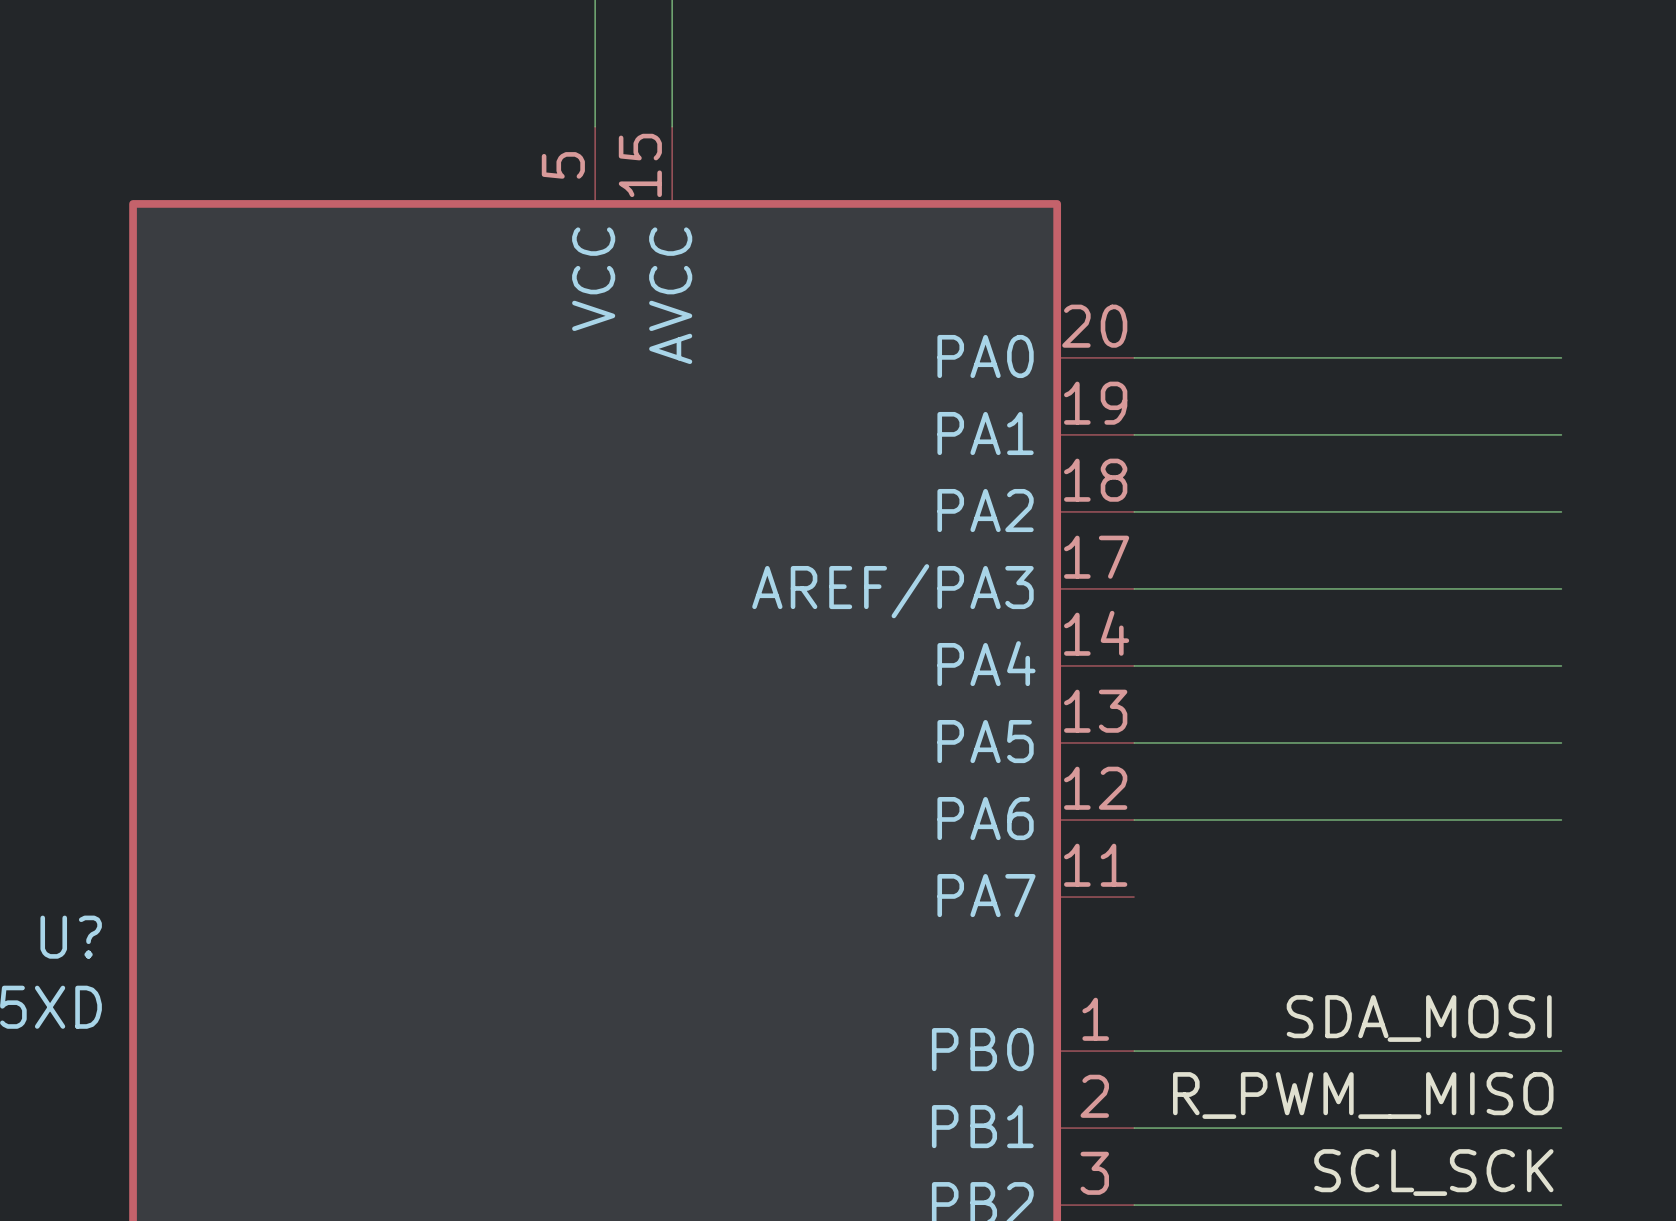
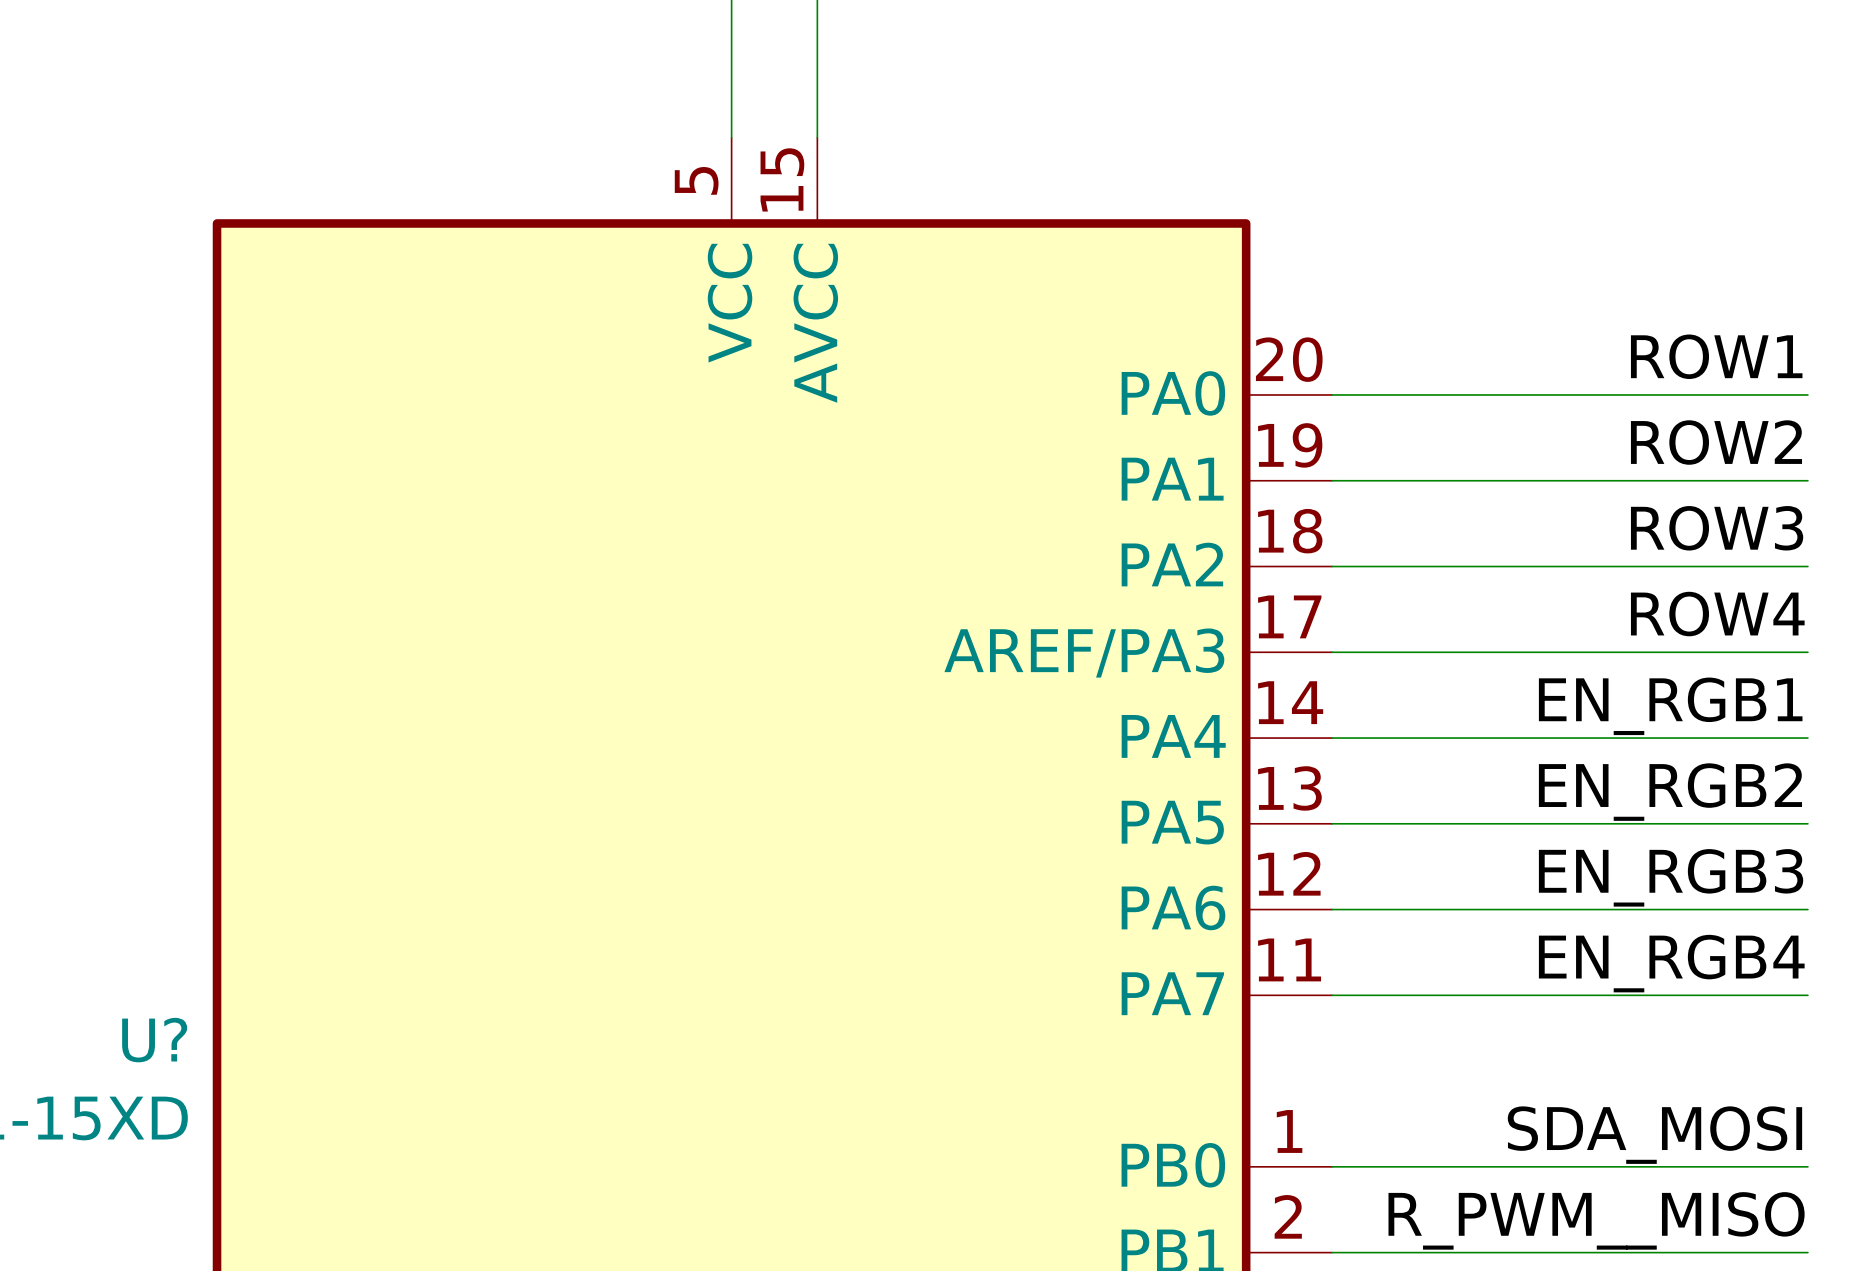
label: none -> ROW1 (1716, 356)
label: none -> ROW2 (1716, 442)
label: none -> ROW3 (1717, 528)
label: none -> ROW4 (1717, 614)
label: none -> EN_RGB1 (1670, 706)
label: none -> EN_RGB2 (1670, 792)
label: none -> EN_RGB3 (1671, 877)
label: none -> EN_RGB4 (1671, 963)
wire: none -> (1331, 995) (1807, 995)

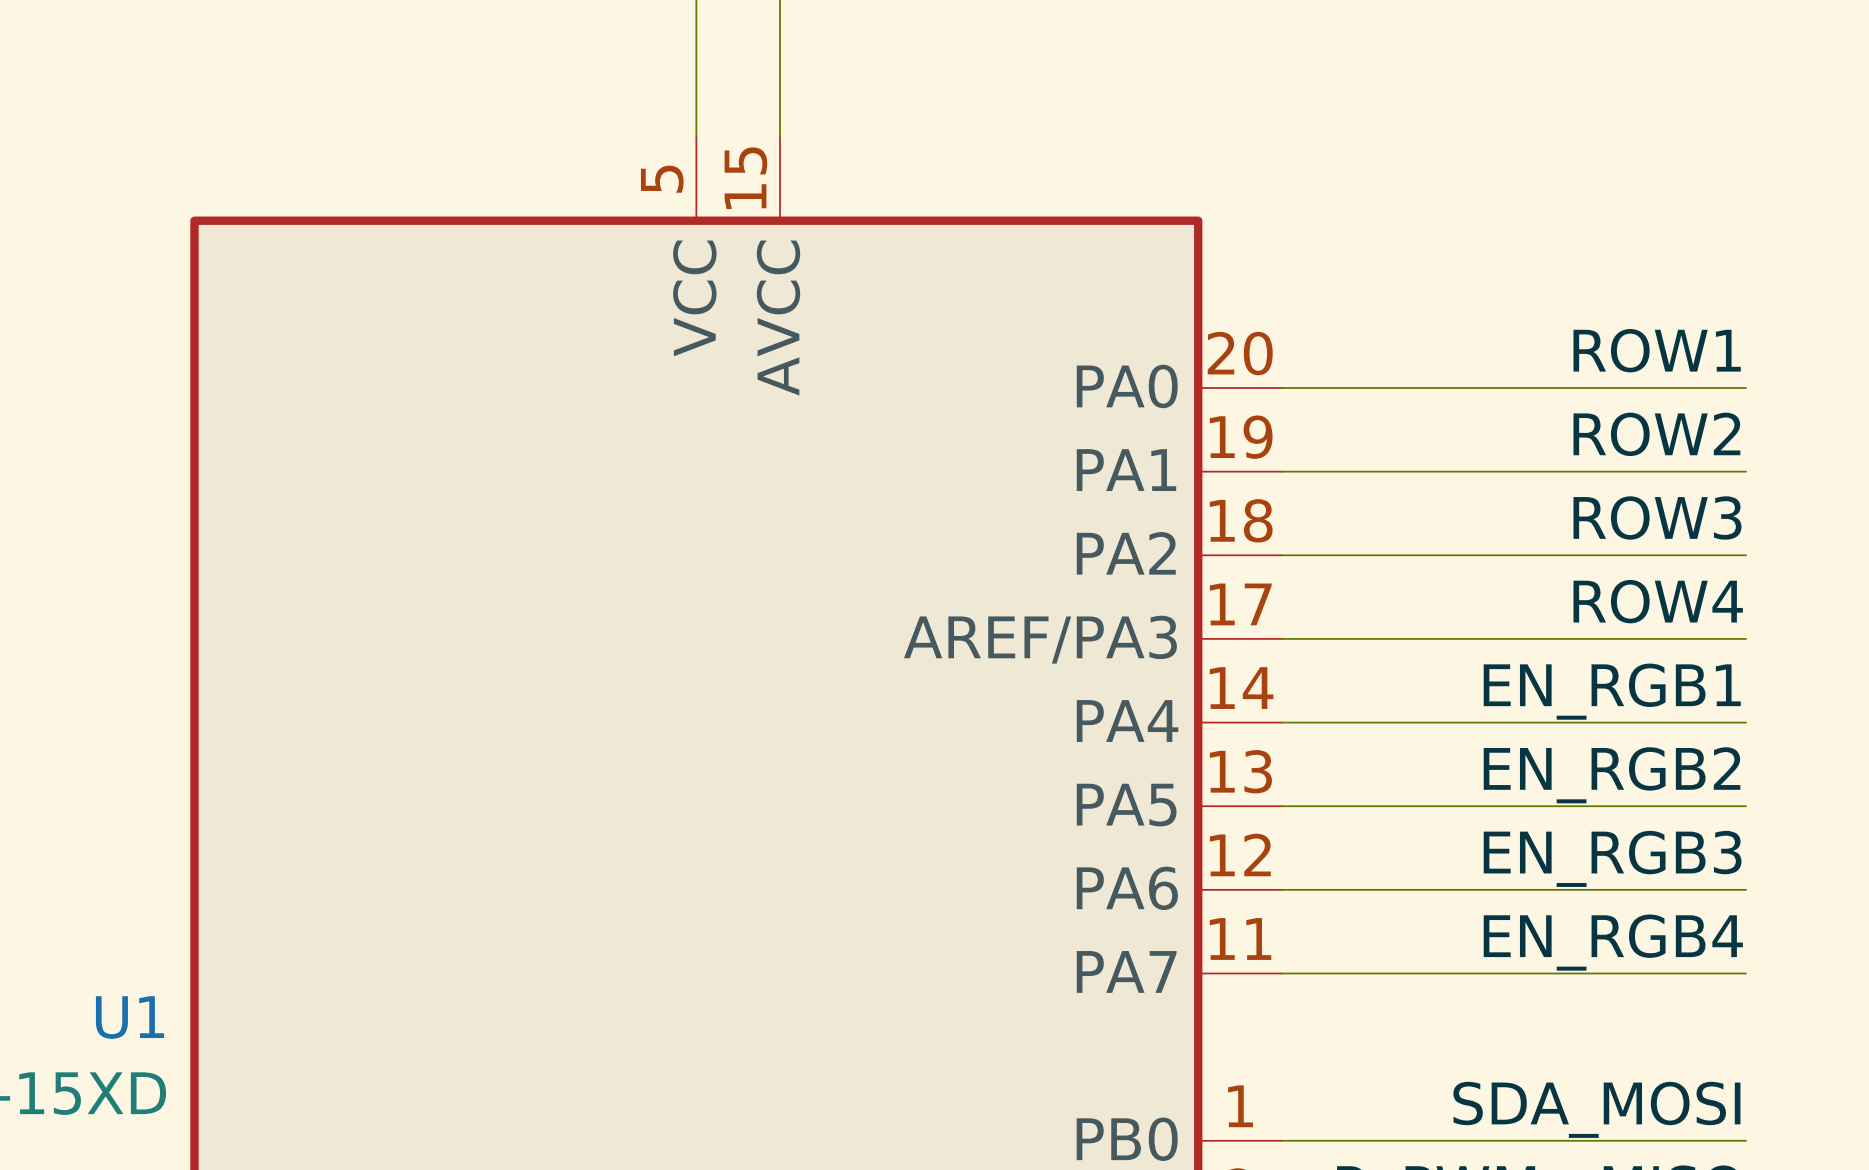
U? name: U? (154, 1040) -> U1 (130, 1017)

